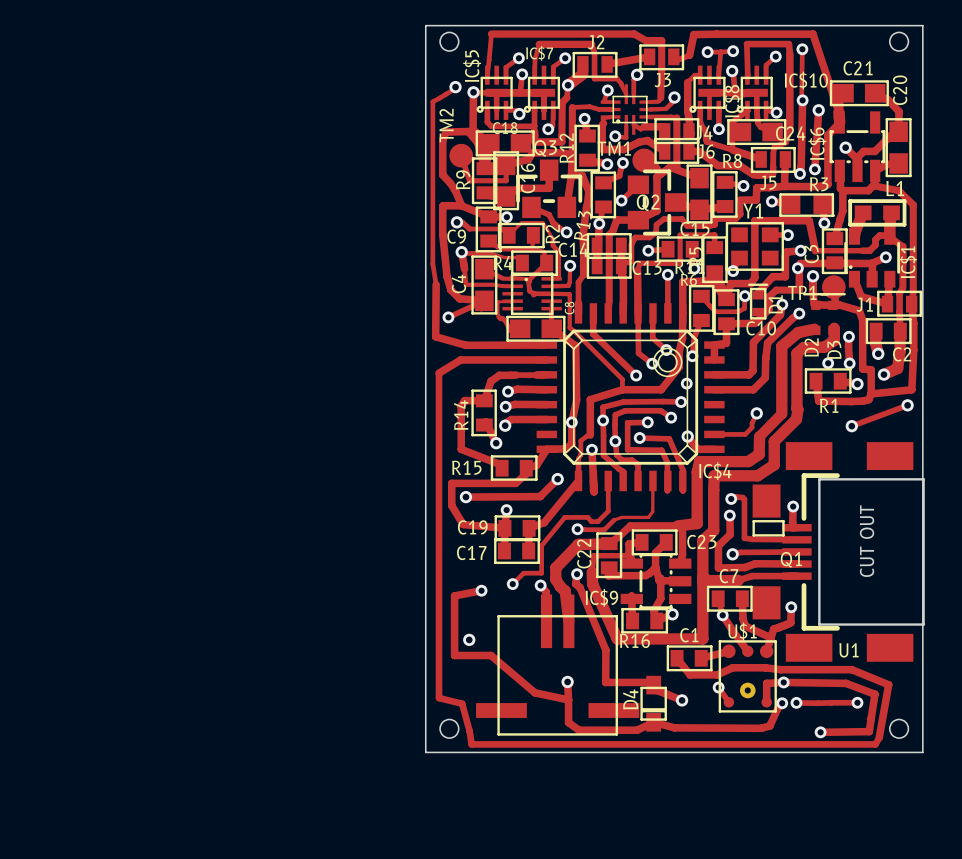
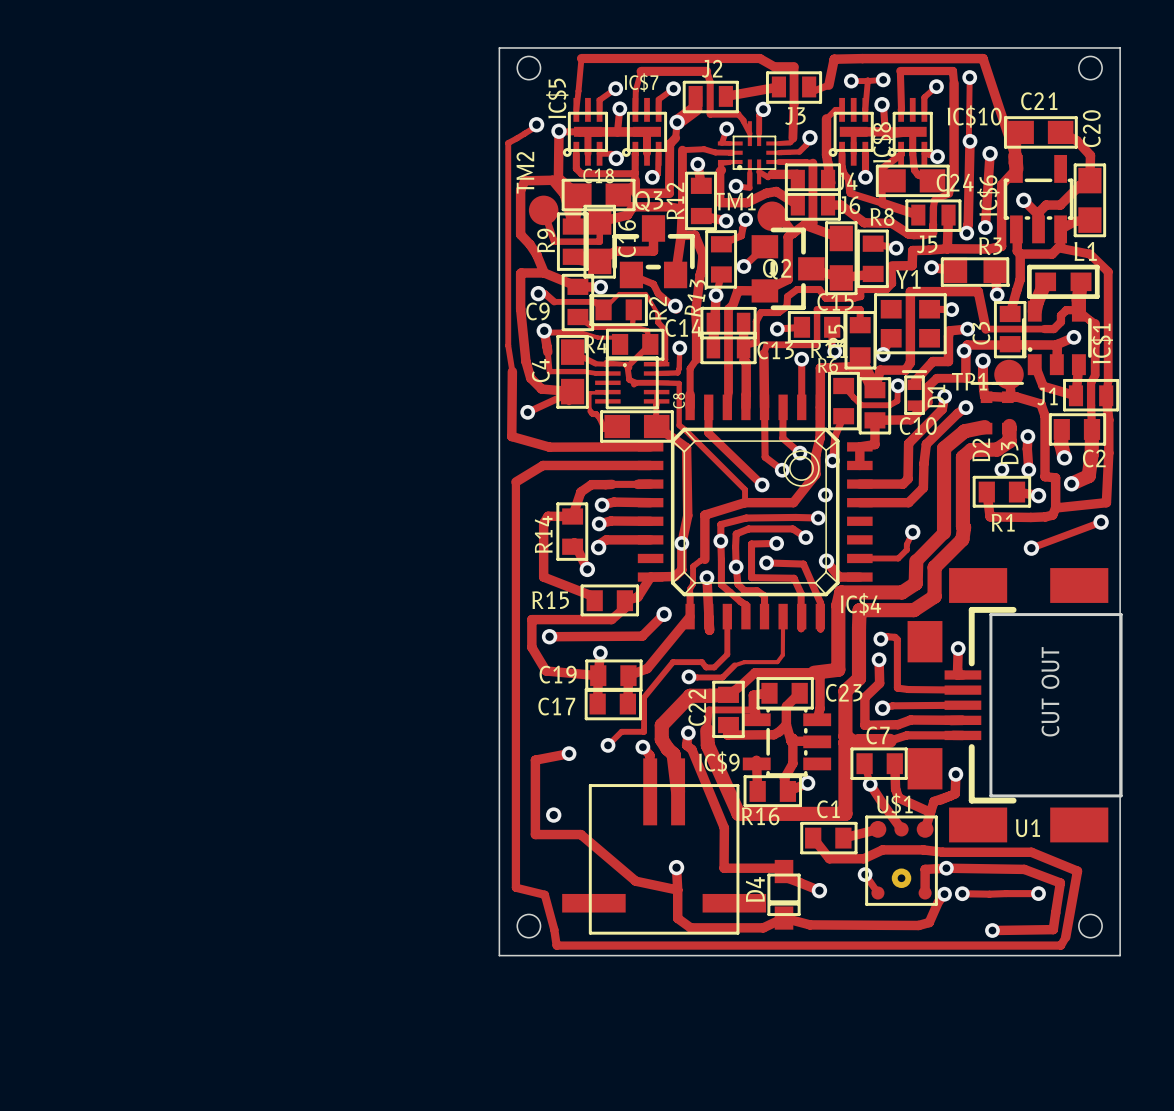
Q1: (768, 528) -> none

